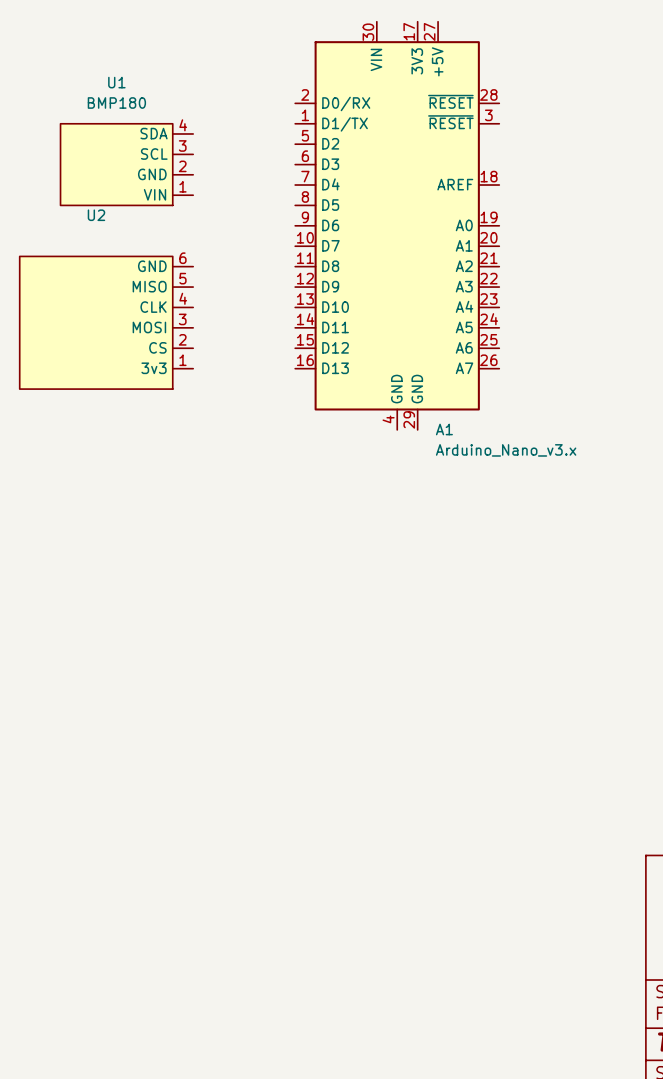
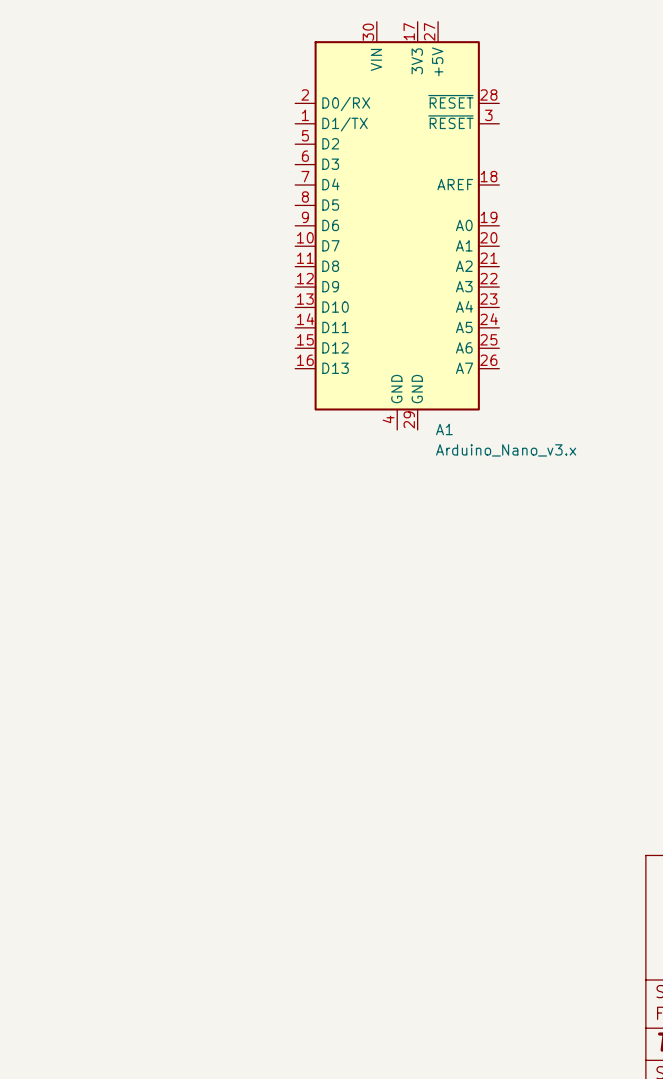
U1: BMP180 (126, 164) -> none
U2: (106, 322) -> none

